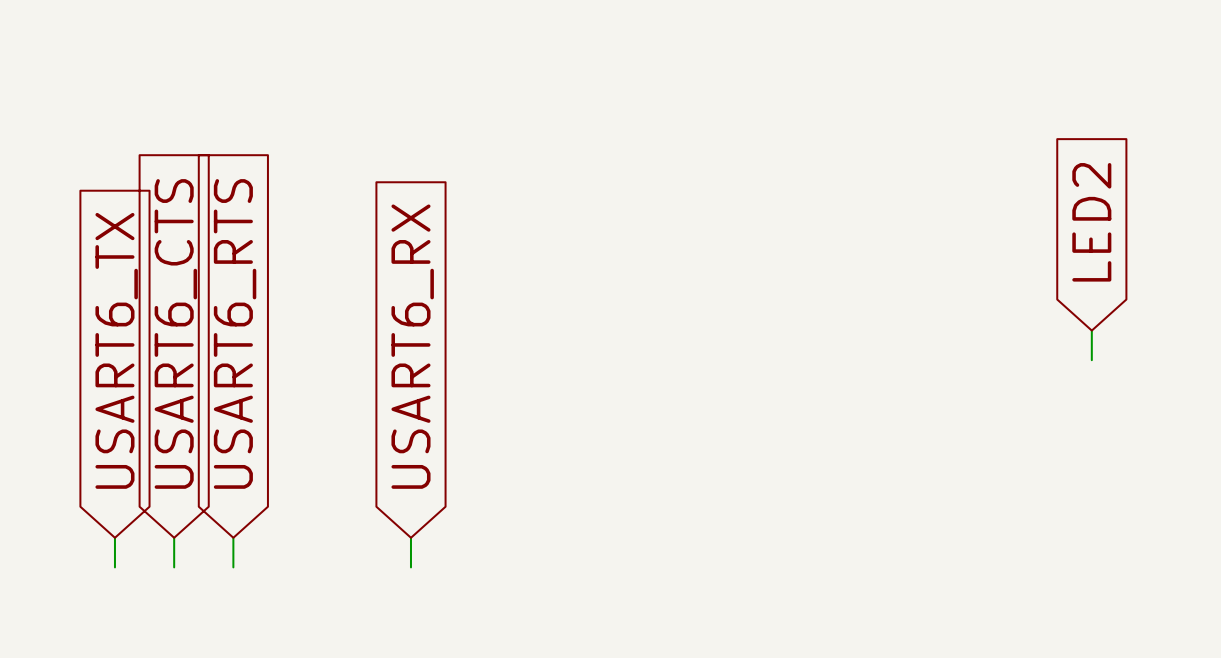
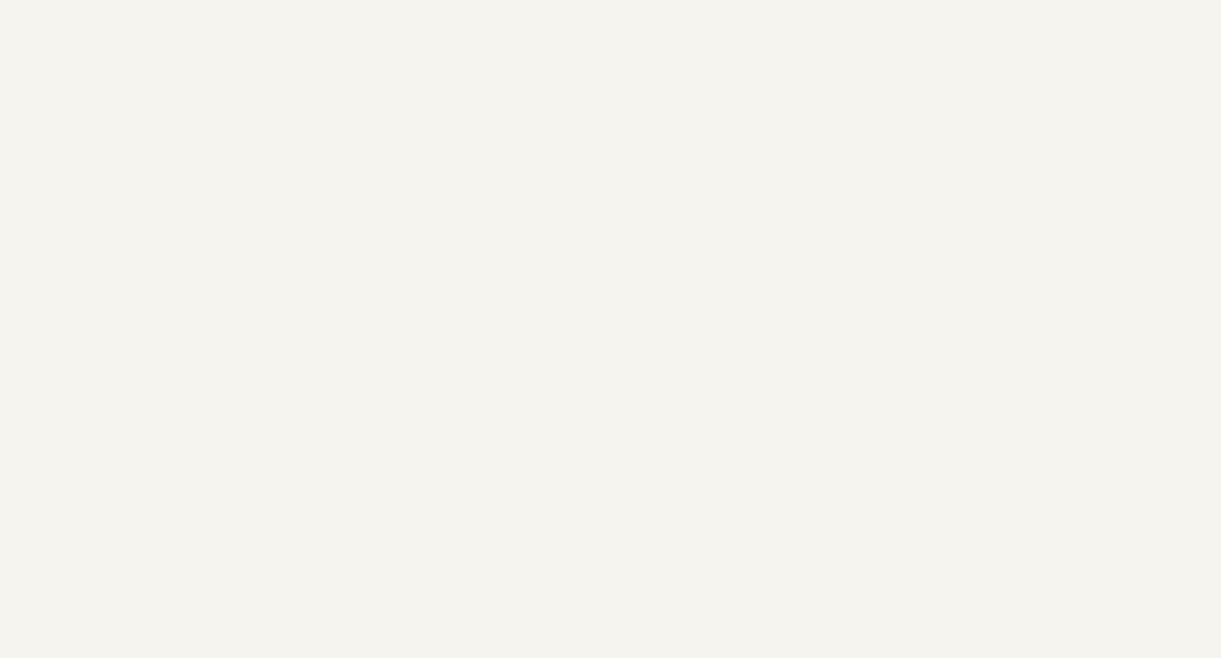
global label: LED2 (1091, 222) -> none
wire: (1091, 330) (1091, 360) -> none
global label: USART6_CTS (175, 333) -> none
global label: USART6_RTS (235, 333) -> none
global label: USART6_RX (412, 346) -> none
global label: USART6_TX (116, 350) -> none
wire: (114, 537) (114, 567) -> none
wire: (174, 537) (174, 567) -> none
wire: (233, 537) (233, 567) -> none
wire: (410, 537) (410, 567) -> none

